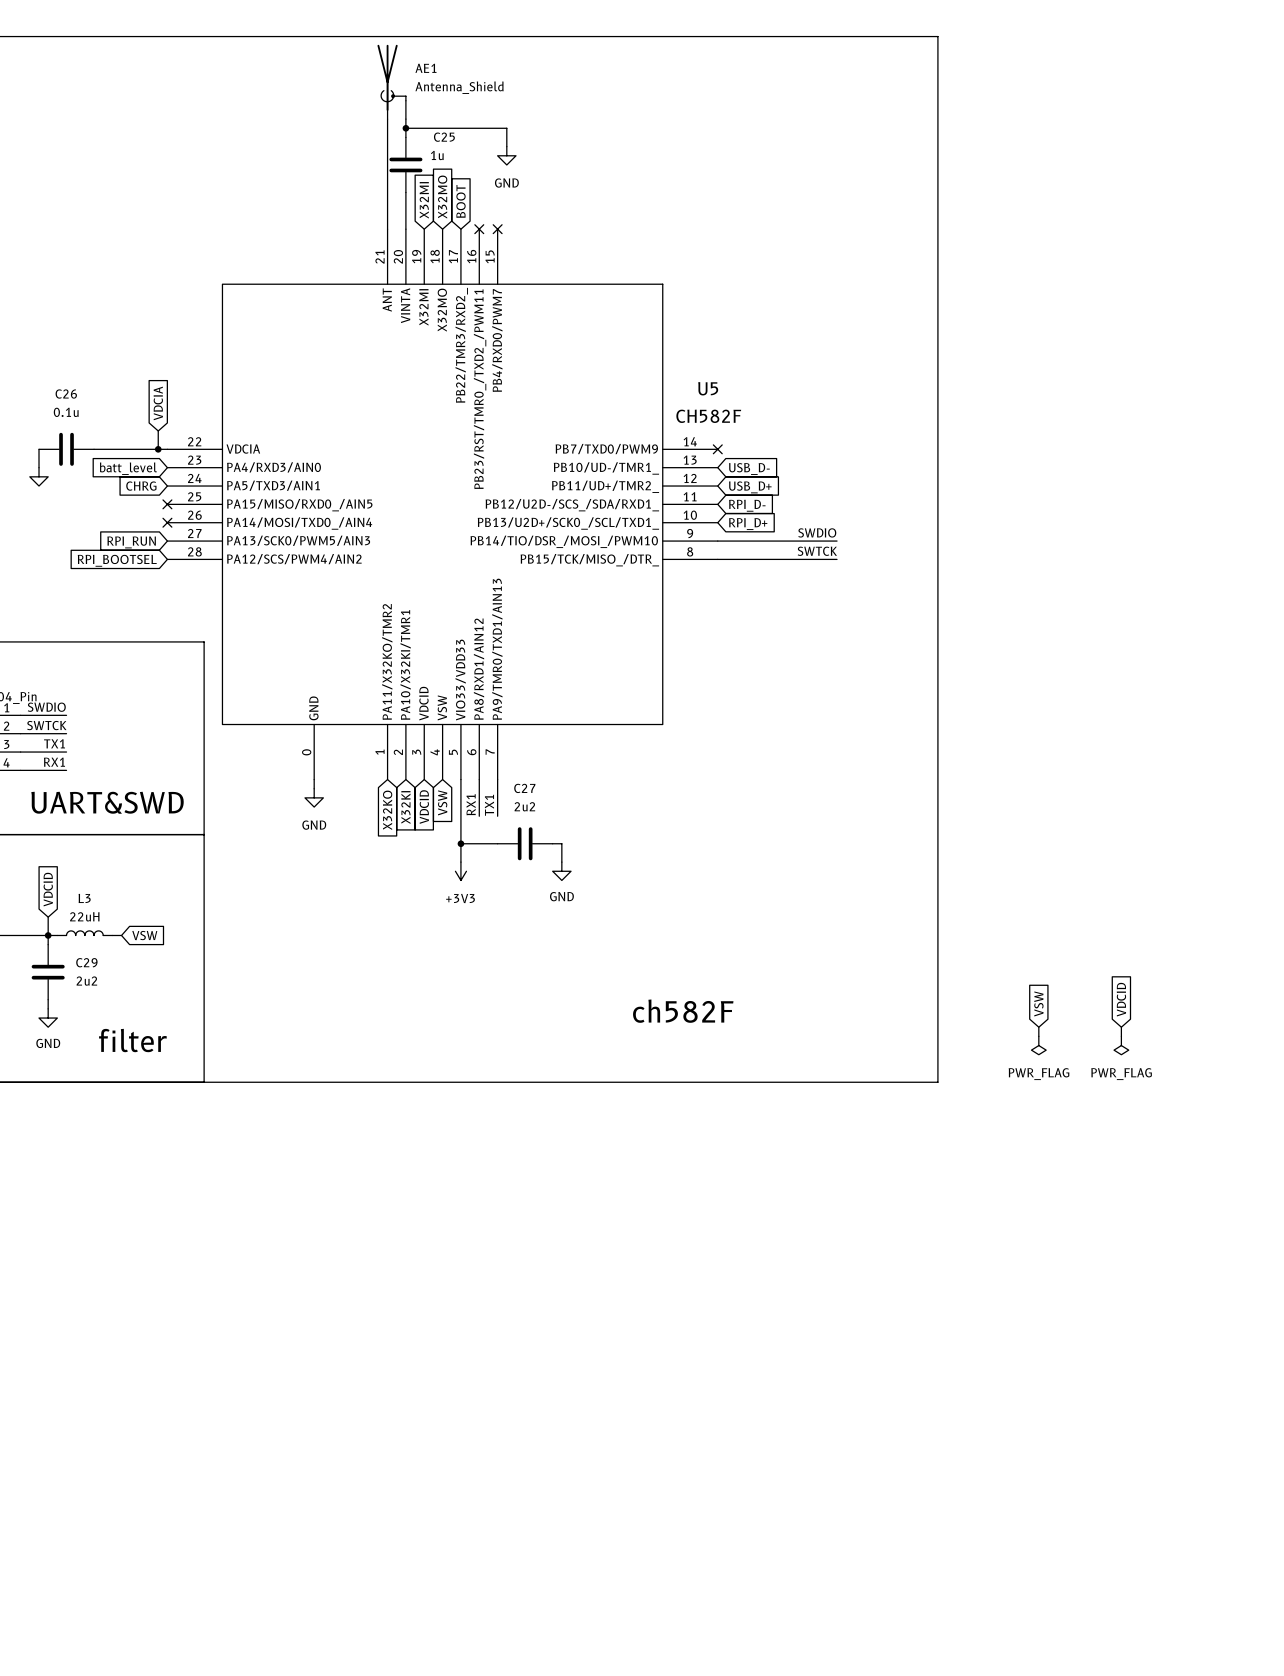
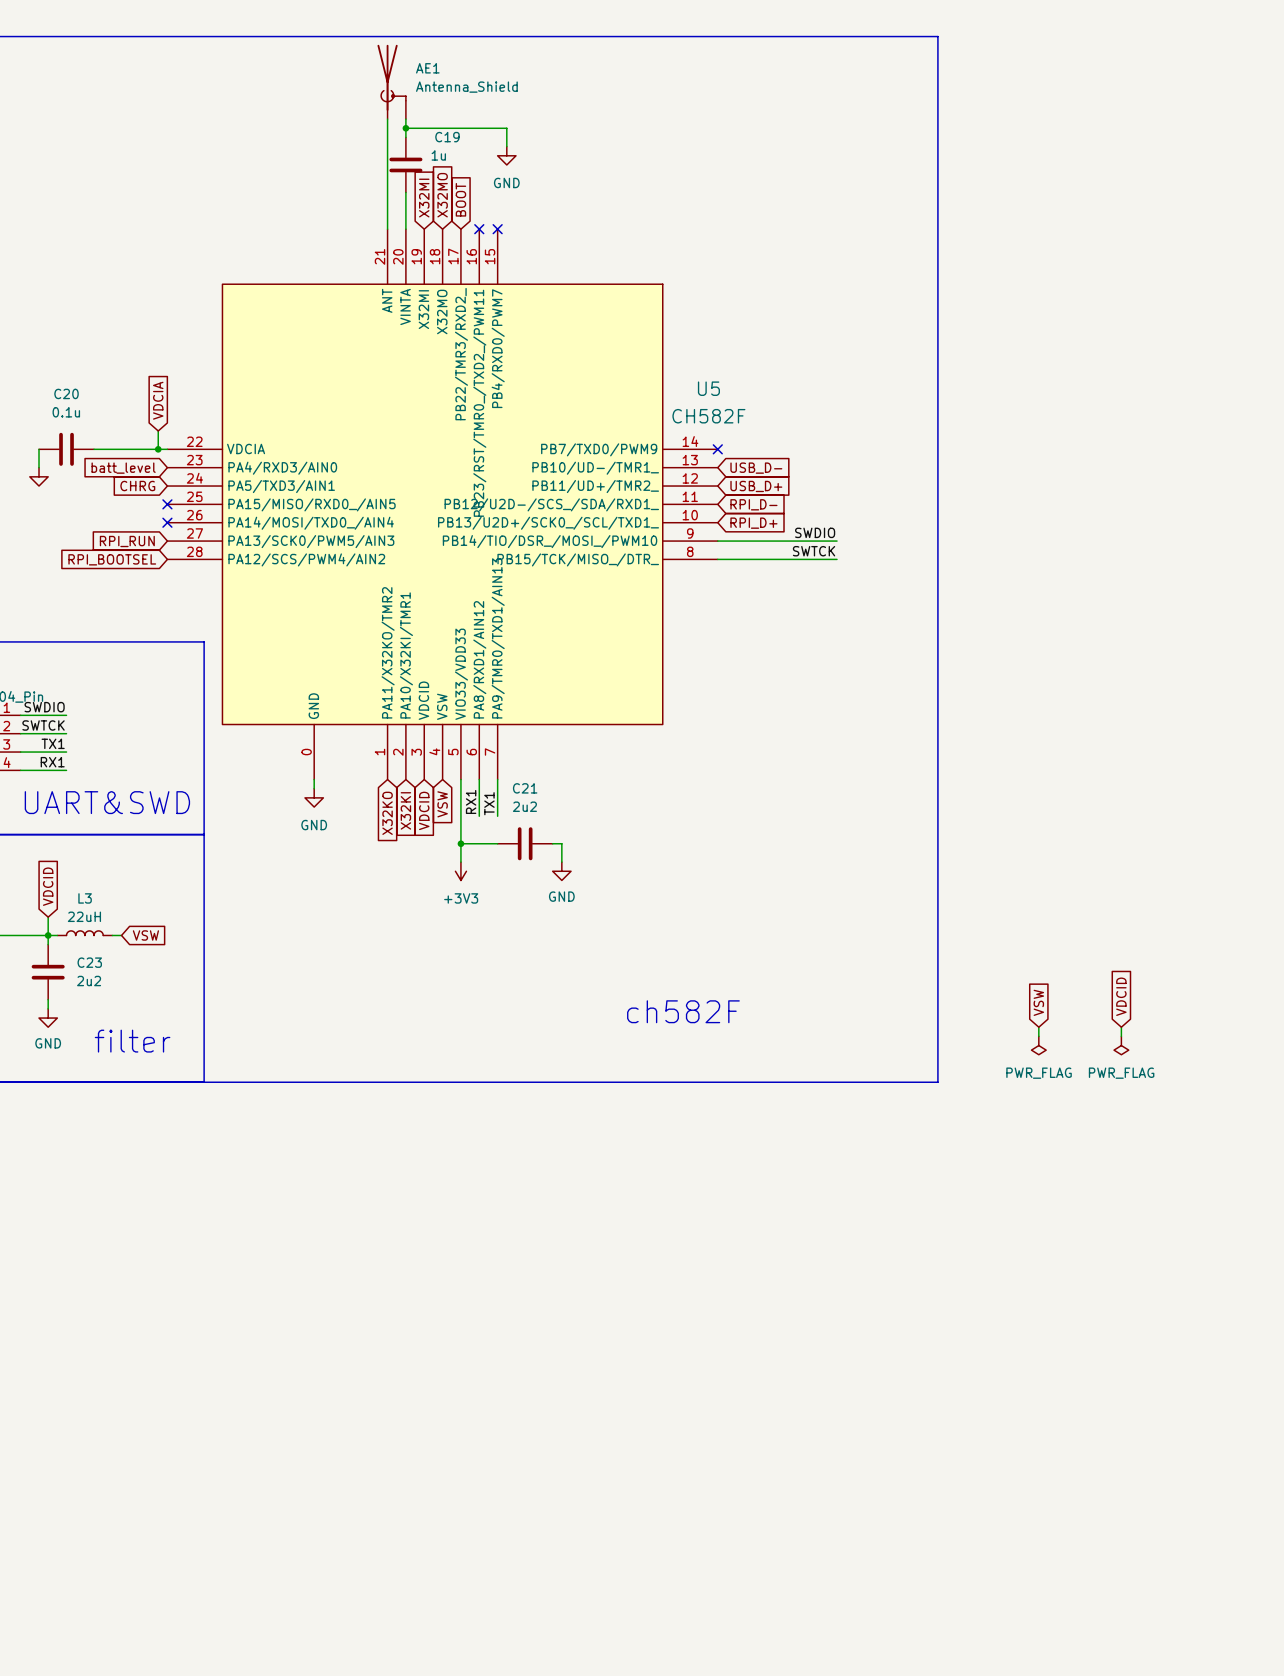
C25 name: C25 (444, 137) -> C19 (447, 137)
C26 name: C26 (66, 394) -> C20 (66, 393)
C27 name: C27 (524, 788) -> C21 (525, 788)
C29 name: C29 (86, 962) -> C23 (89, 962)

